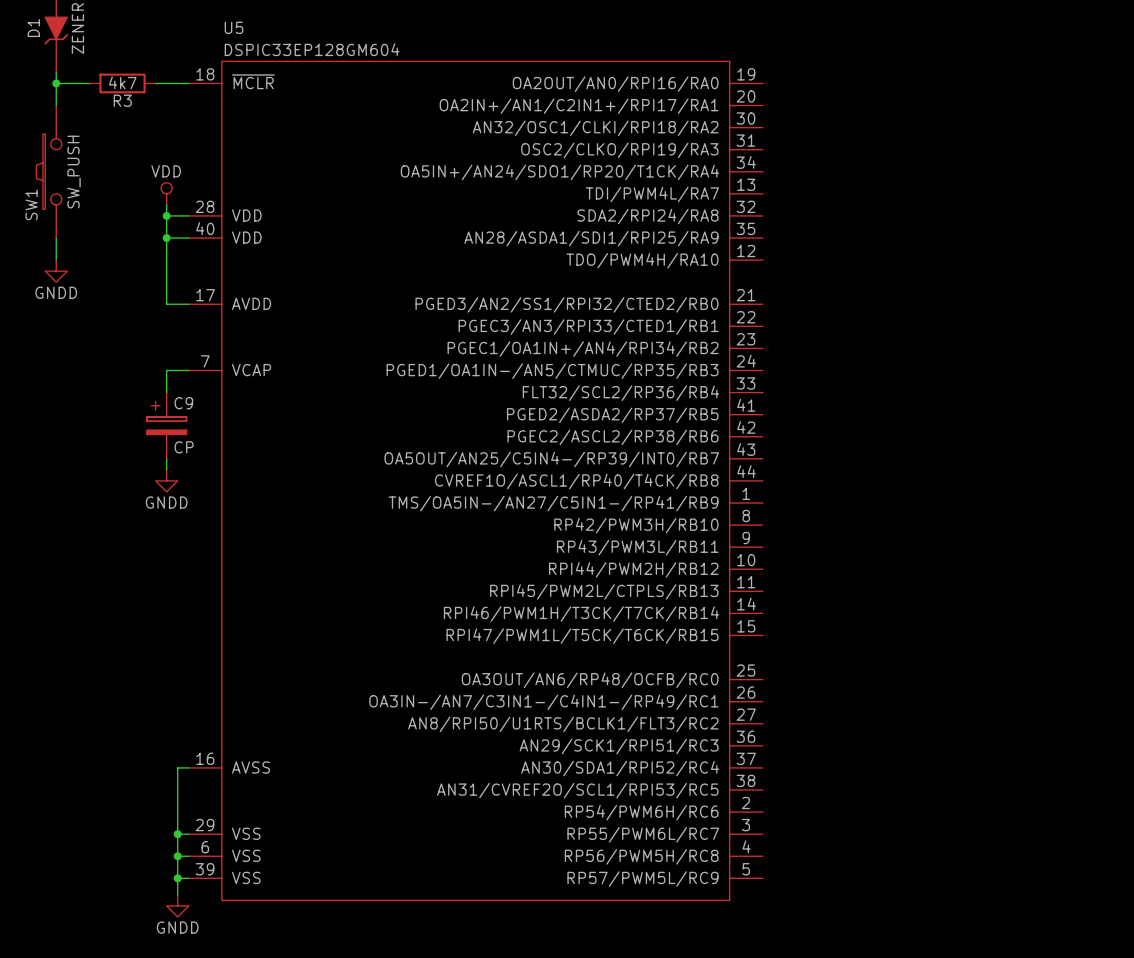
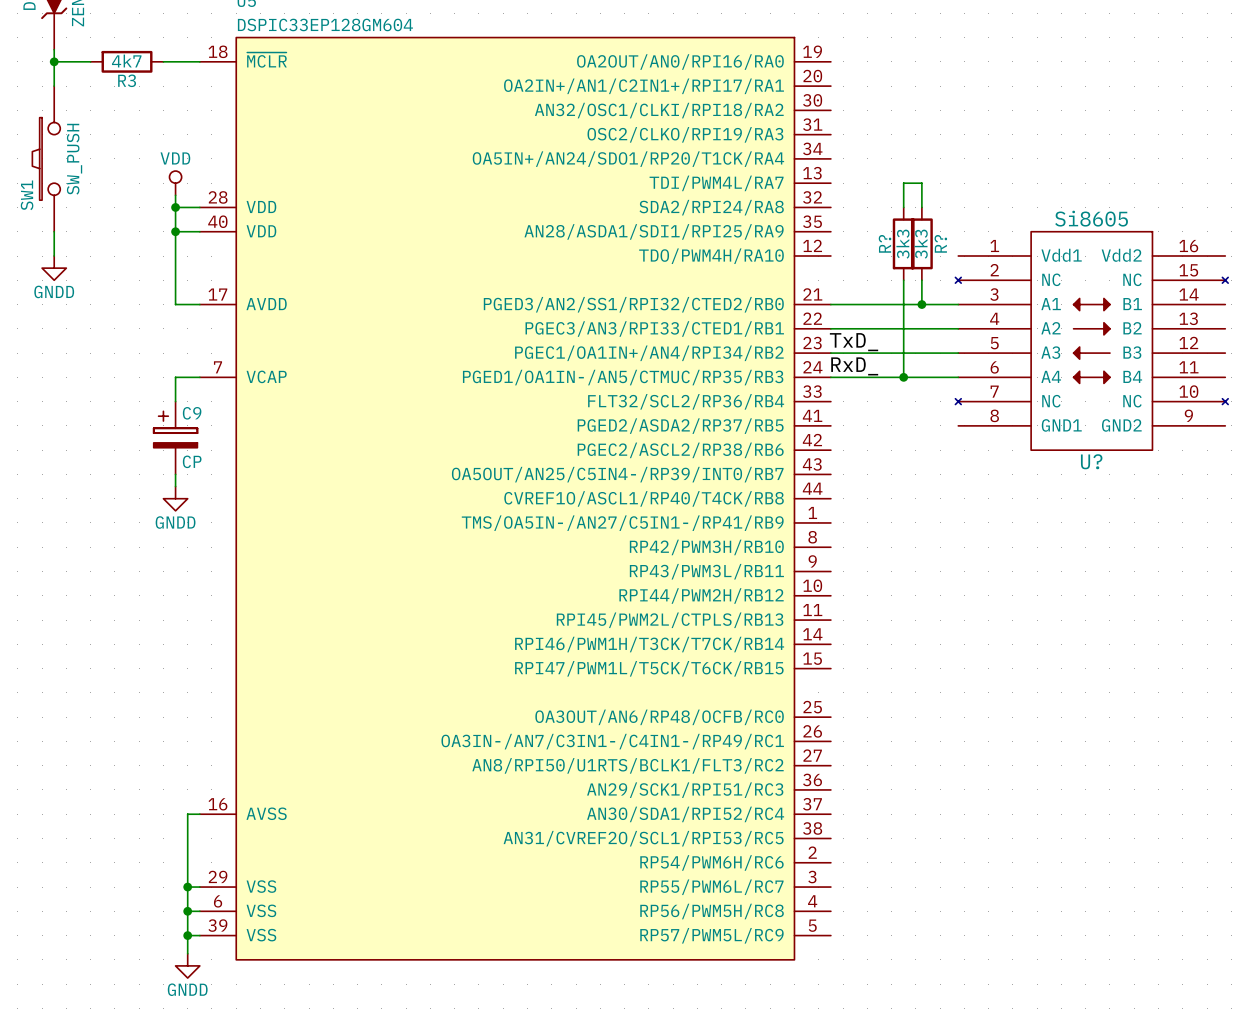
wire: none -> (903, 207) (903, 183) (921, 183) (921, 207)
R?: none -> 3k3 (903, 243)
R?: none -> 3k3 (921, 243)
wire: none -> (903, 280) (903, 377)
wire: none -> (921, 280) (921, 304)
wire: none -> (830, 304) (958, 304)
junction: none -> (921, 304)
wire: none -> (830, 328) (958, 328)
label: none -> TxD_ (854, 342)
U?: none -> Si8605 (1091, 340)
wire: none -> (830, 353) (958, 353)
label: none -> RxD_ (854, 366)
wire: none -> (830, 377) (958, 377)
junction: none -> (903, 377)

